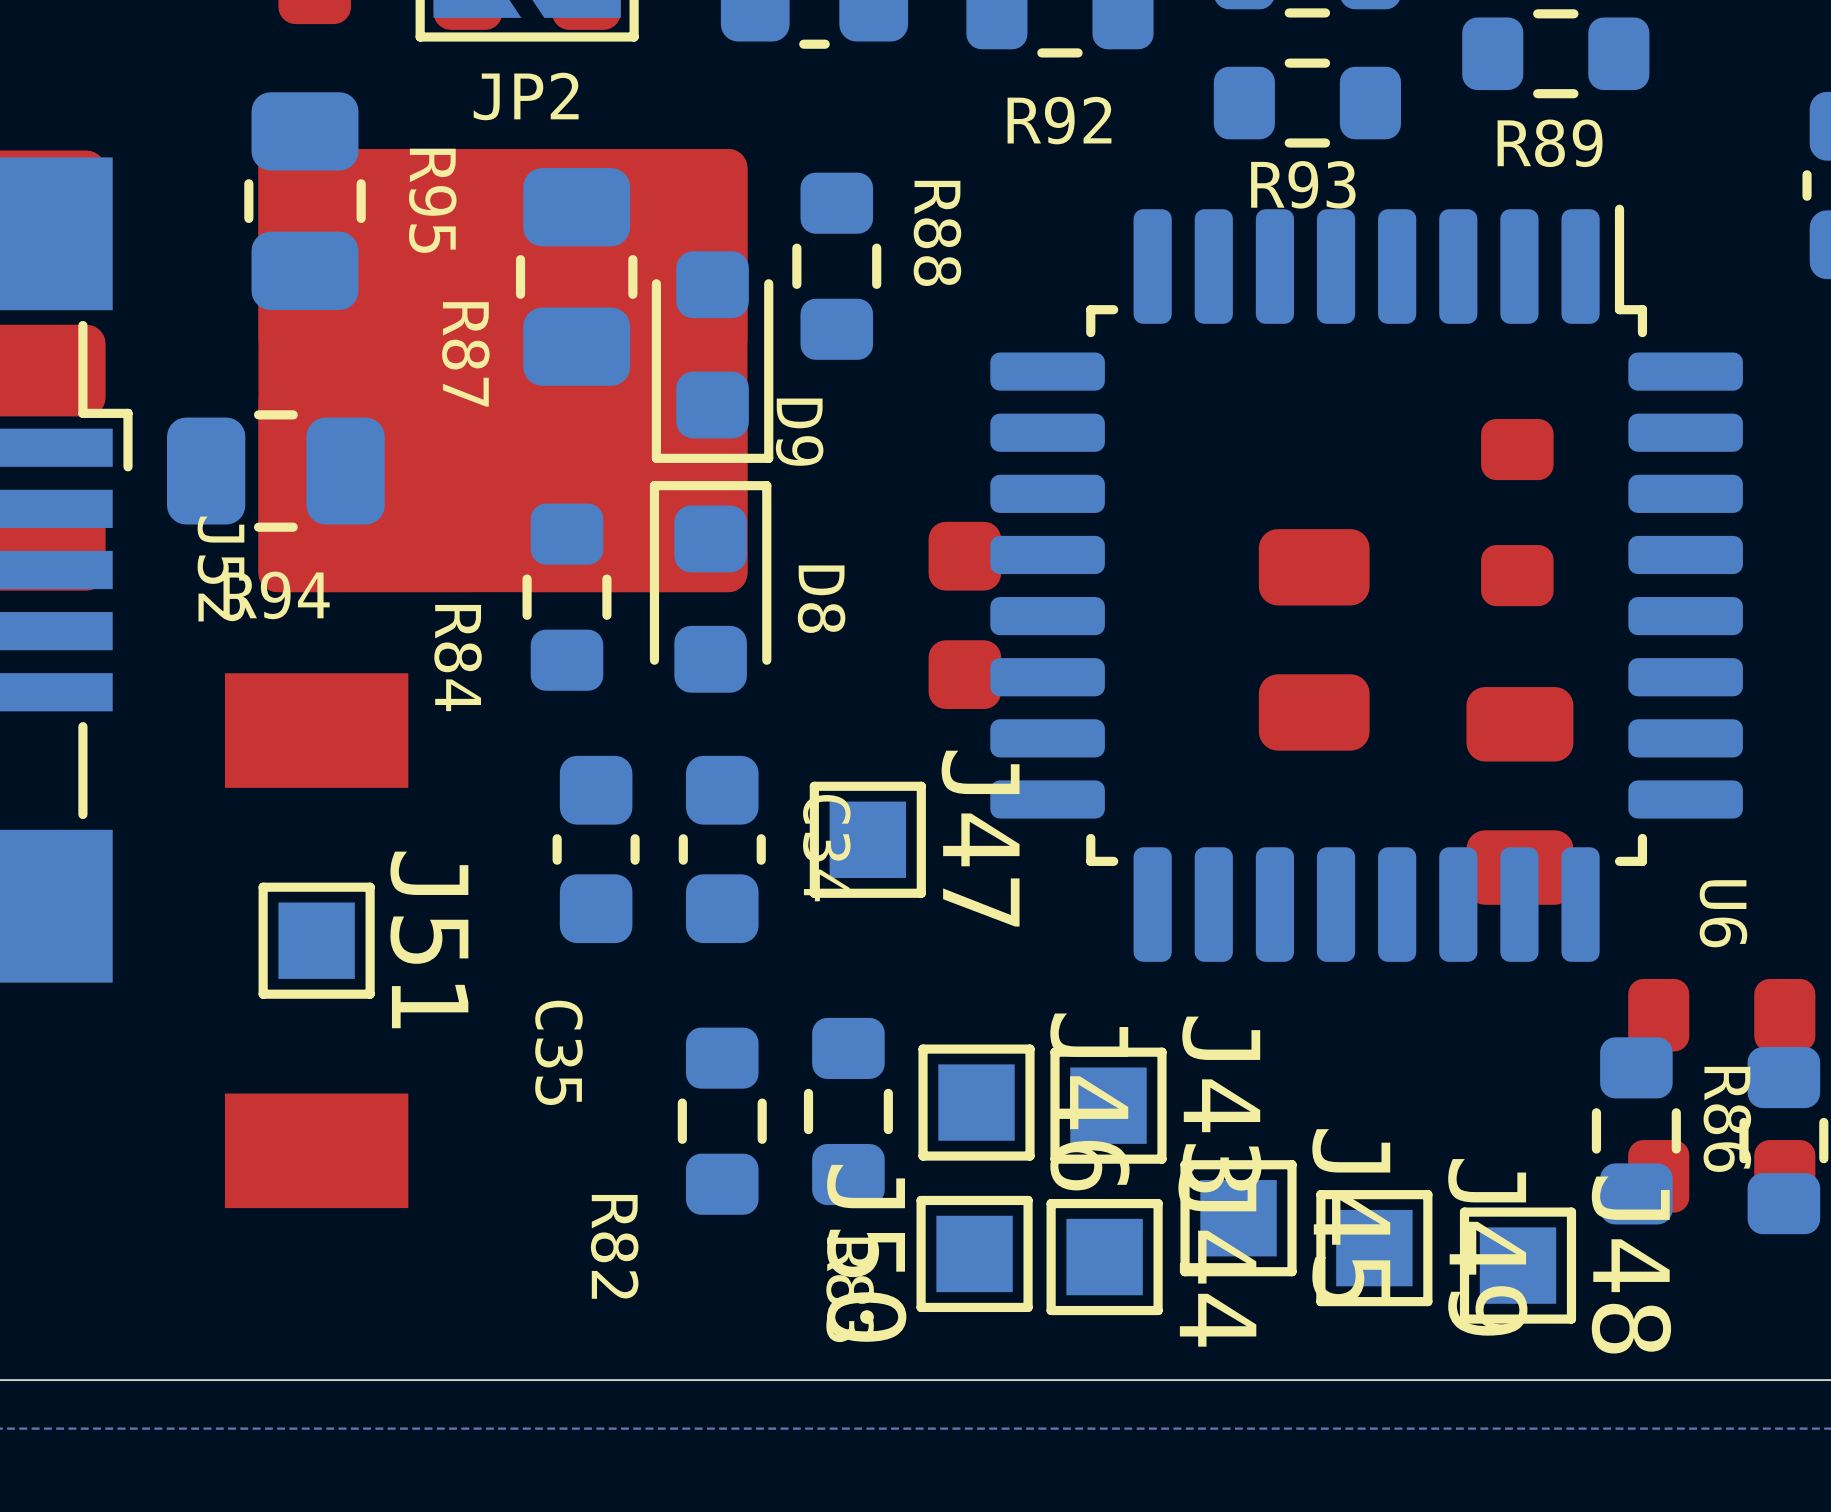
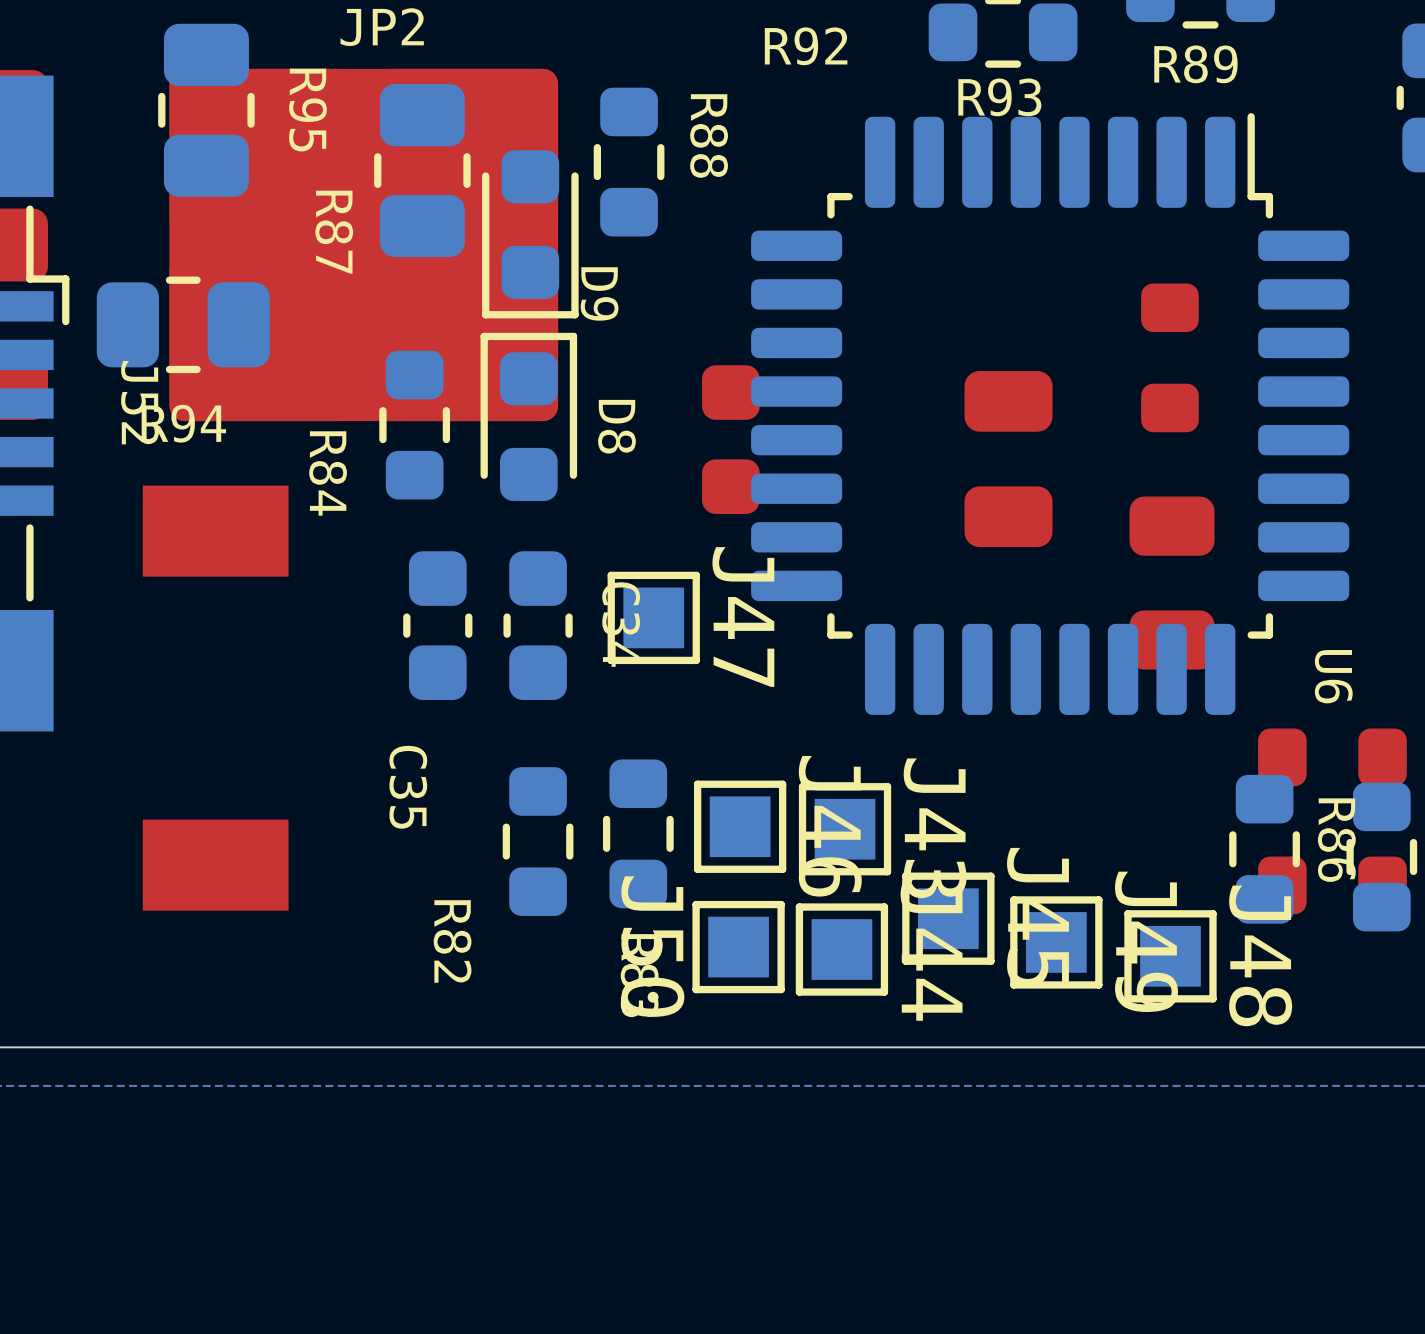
J51: (316, 940) -> none

